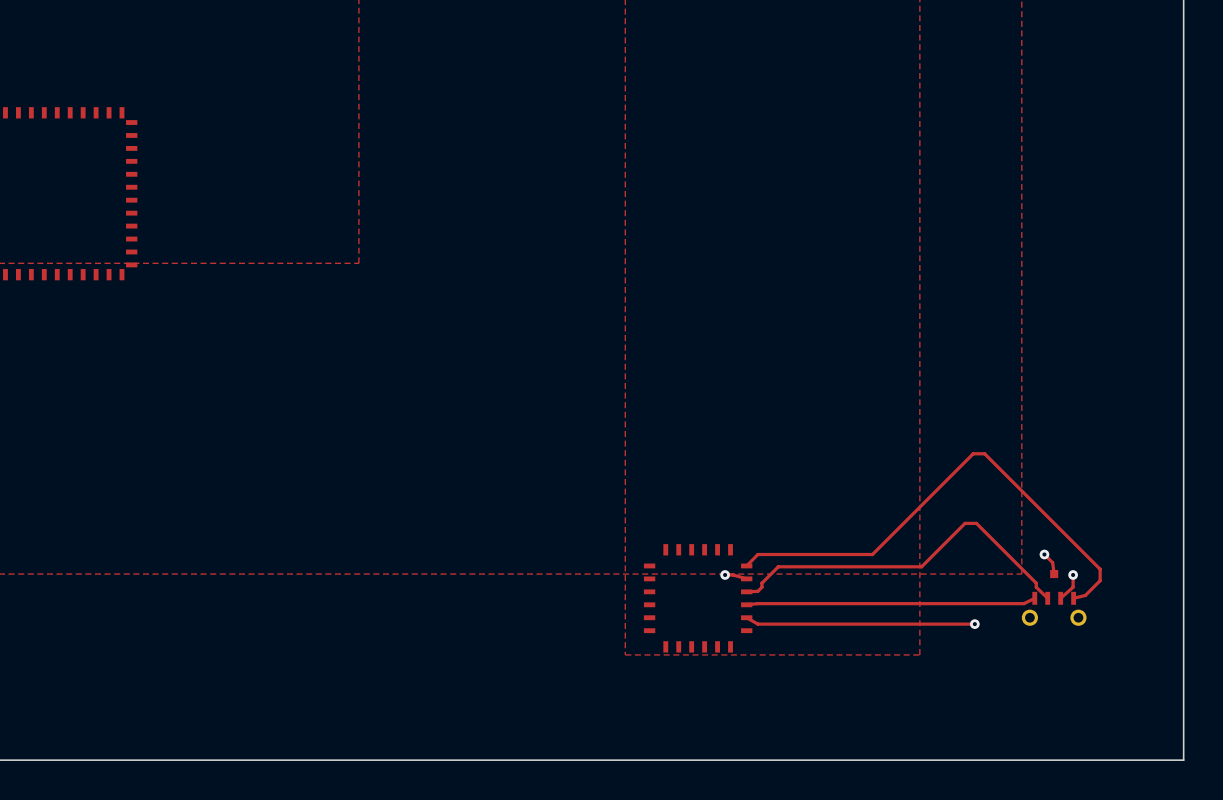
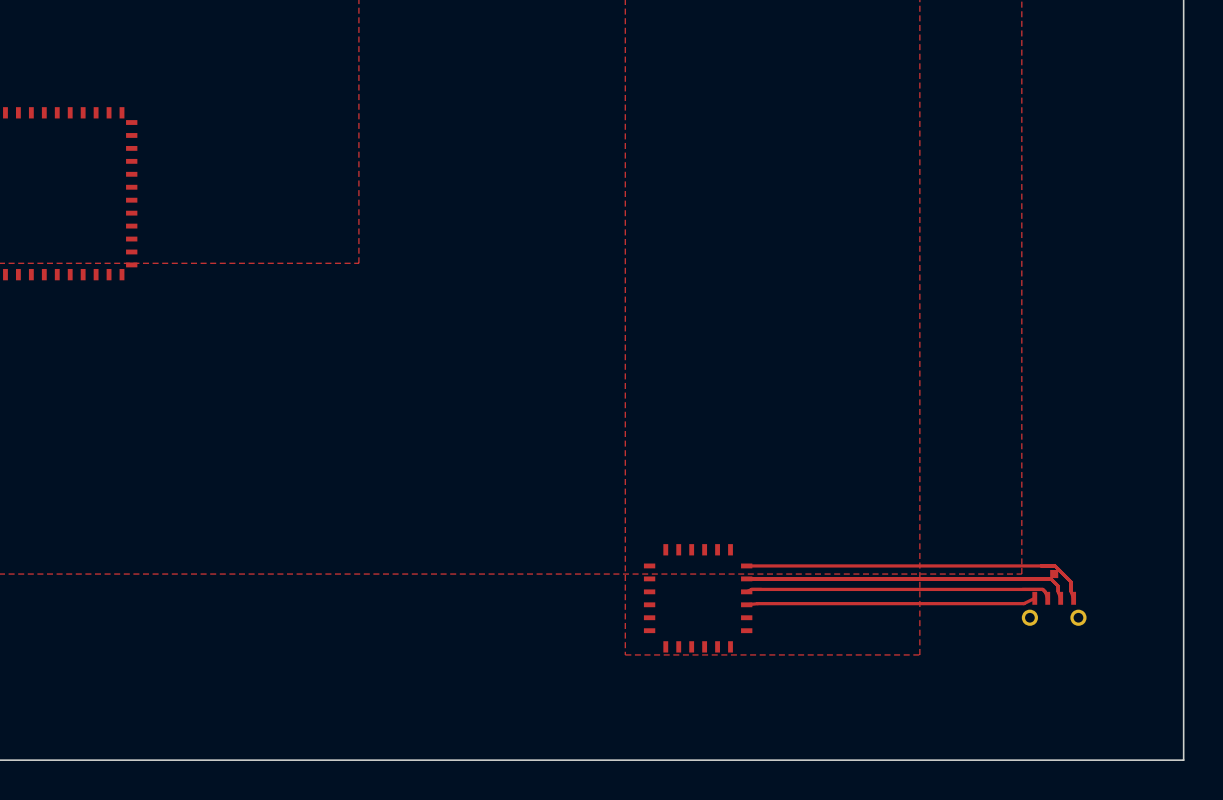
top track: (1044, 554) (1052, 562) (1054, 574) -> none
via: (1044, 554) -> none
top track: (746, 565) (757, 554) (872, 554) (973, 453) (984, 453) (1100, 569) (1100, 580) (1085, 595) (1073, 598) -> (746, 565) (1054, 565) (1071, 582) (1073, 598)
top track: (725, 574) (746, 578) -> none
via: (725, 574) -> none
top track: (1073, 574) (1073, 587) (1060, 598) -> (746, 578) (1050, 578) (1058, 586) (1060, 598)
via: (1073, 574) -> none
top track: (746, 591) (757, 591) (761, 587) (761, 583) (778, 566) (921, 566) (965, 523) (976, 523) (1036, 583) (1036, 587) (1047, 598) -> (746, 591) (751, 589) (1042, 589) (1047, 598)
top track: (746, 617) (757, 624) (974, 624) -> none
via: (974, 624) -> none

